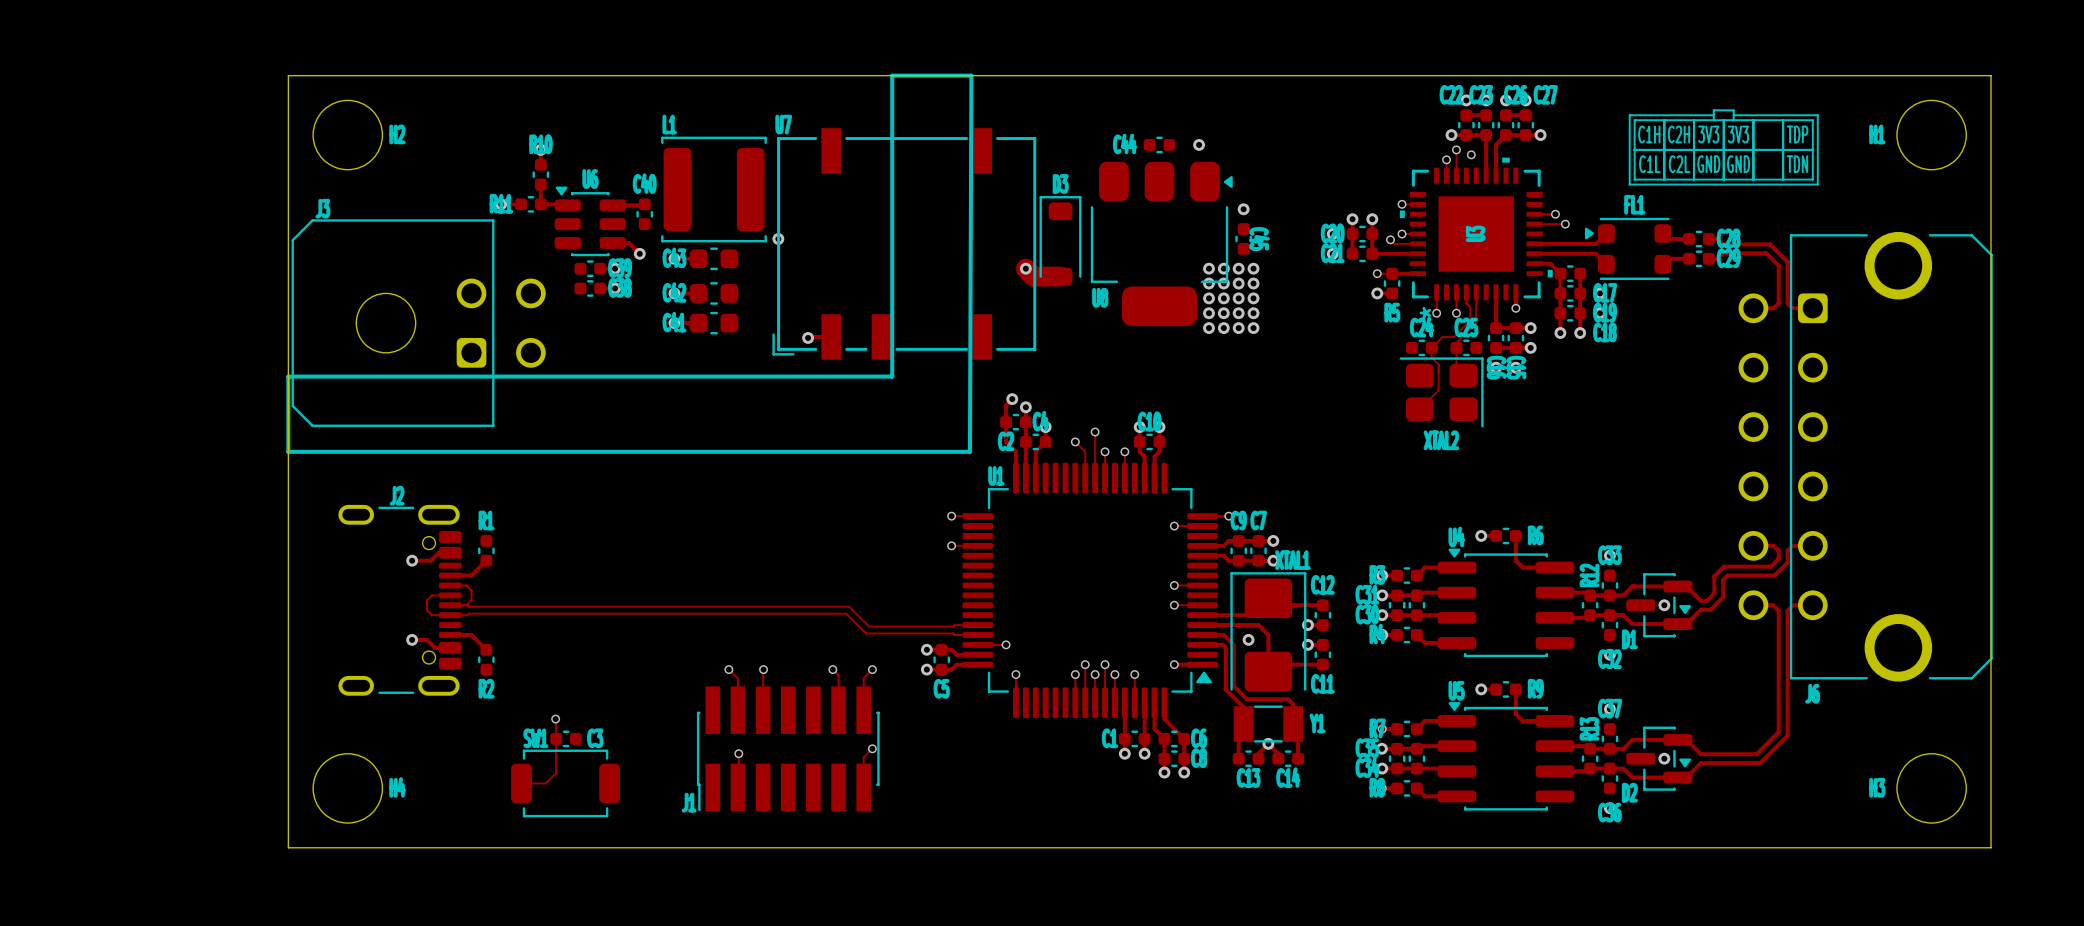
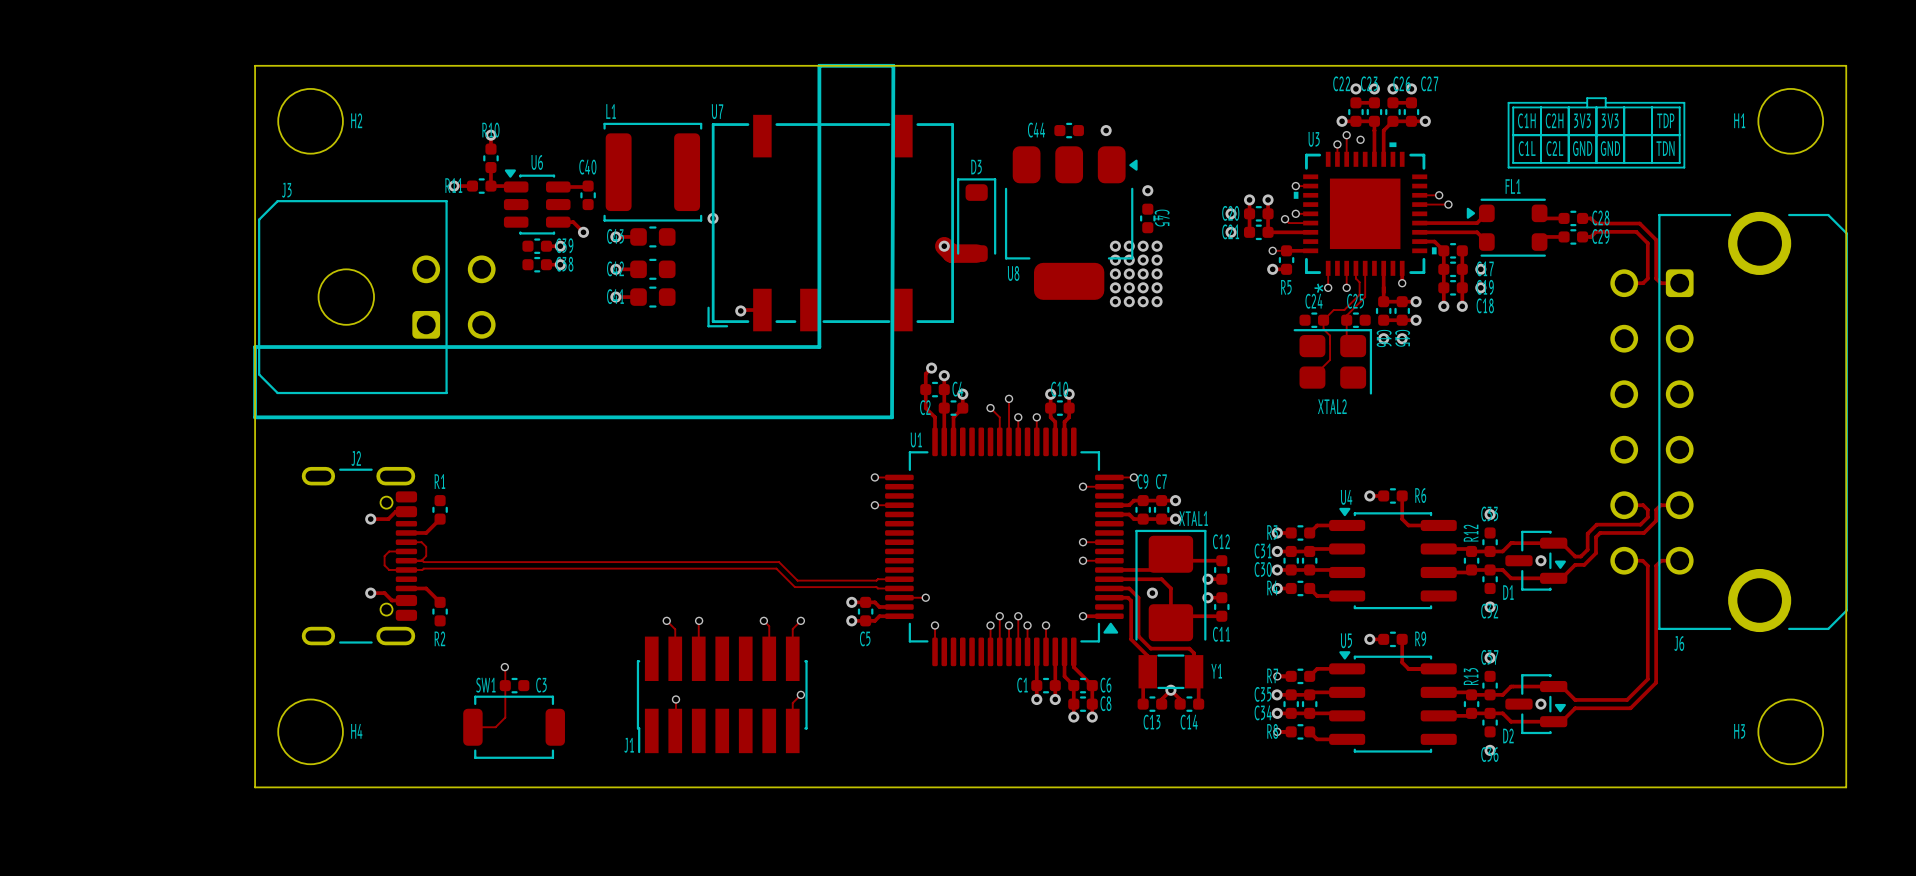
U3 name rotation: 0° (1475, 233) -> 90° clockwise (1314, 139)
U3 name position: U3 (1475, 233) -> U3 (1314, 139)

